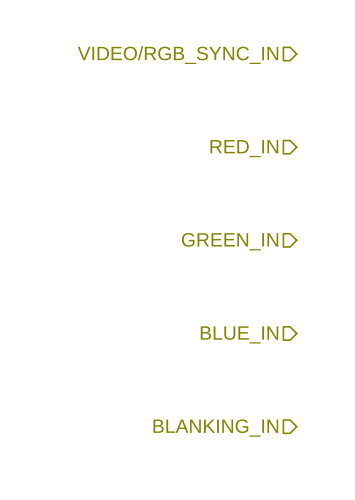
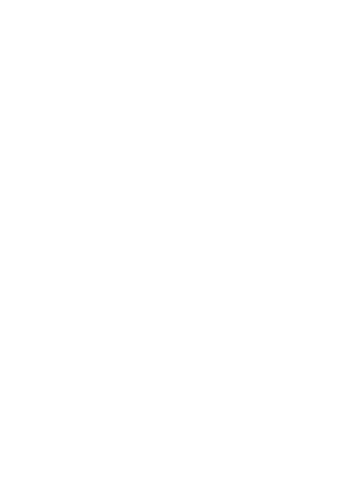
hierarchical label: VIDEO/RGB_SYNC_IN (178, 55) -> none
hierarchical label: RED_IN (244, 148) -> none
hierarchical label: GREEN_IN (230, 241) -> none
hierarchical label: BLUE_IN (239, 334) -> none
hierarchical label: BLANKING_IN (215, 428) -> none

